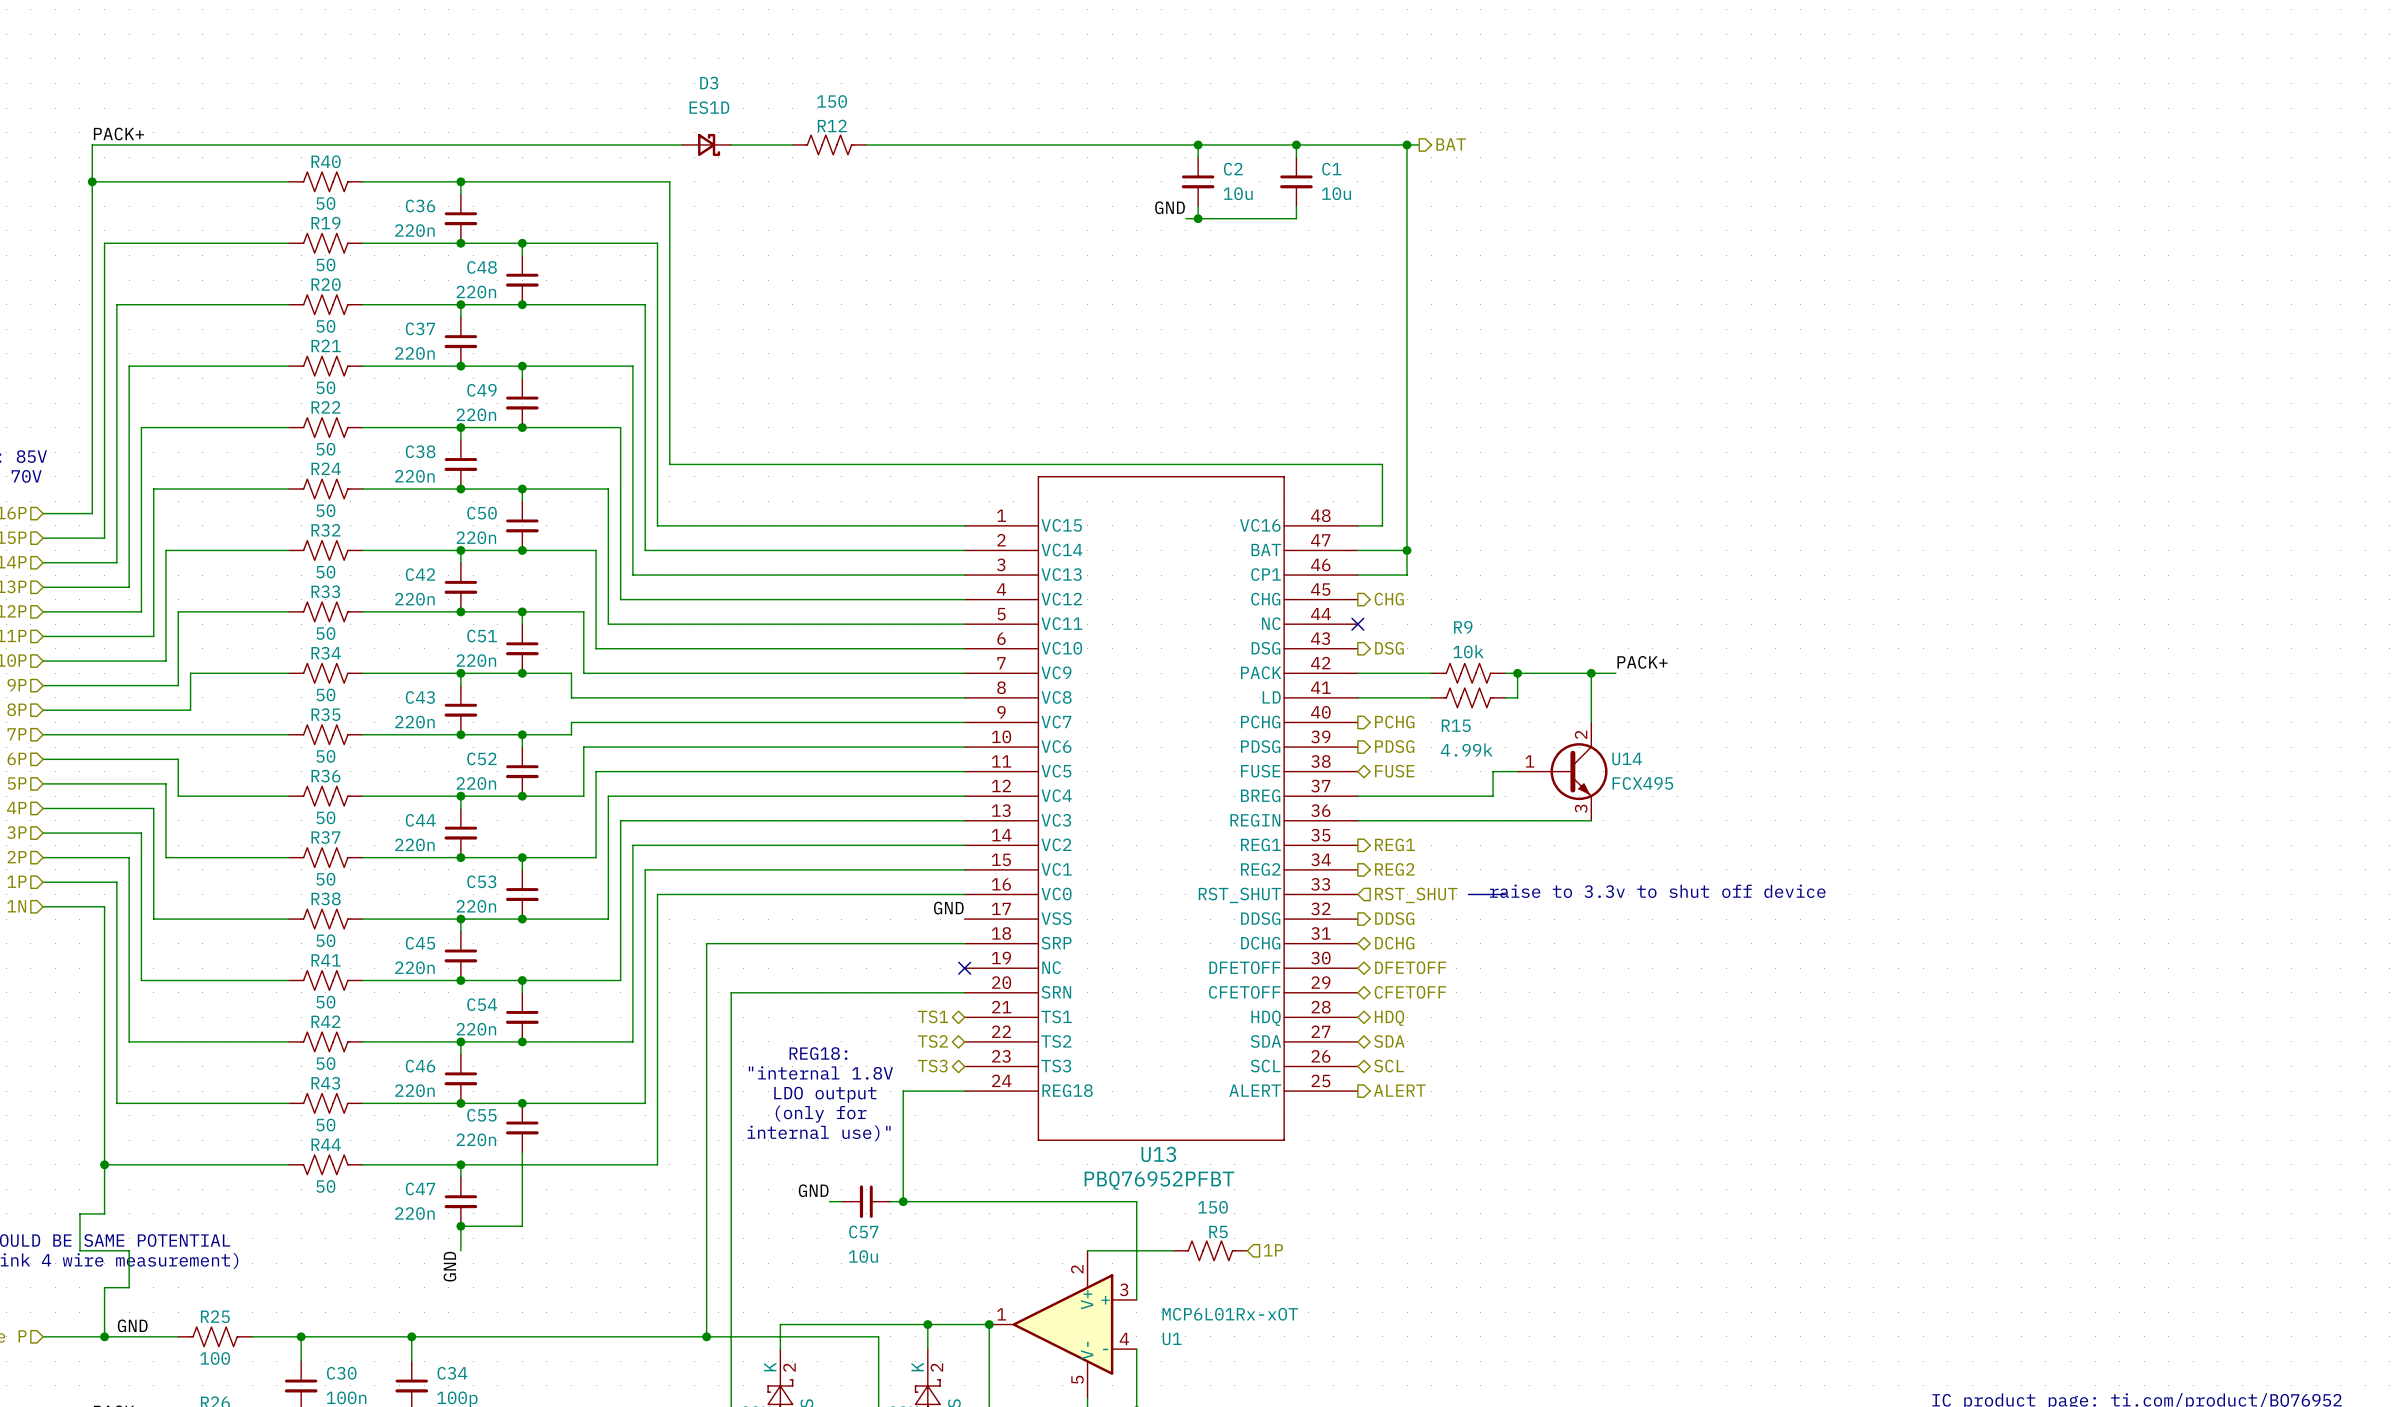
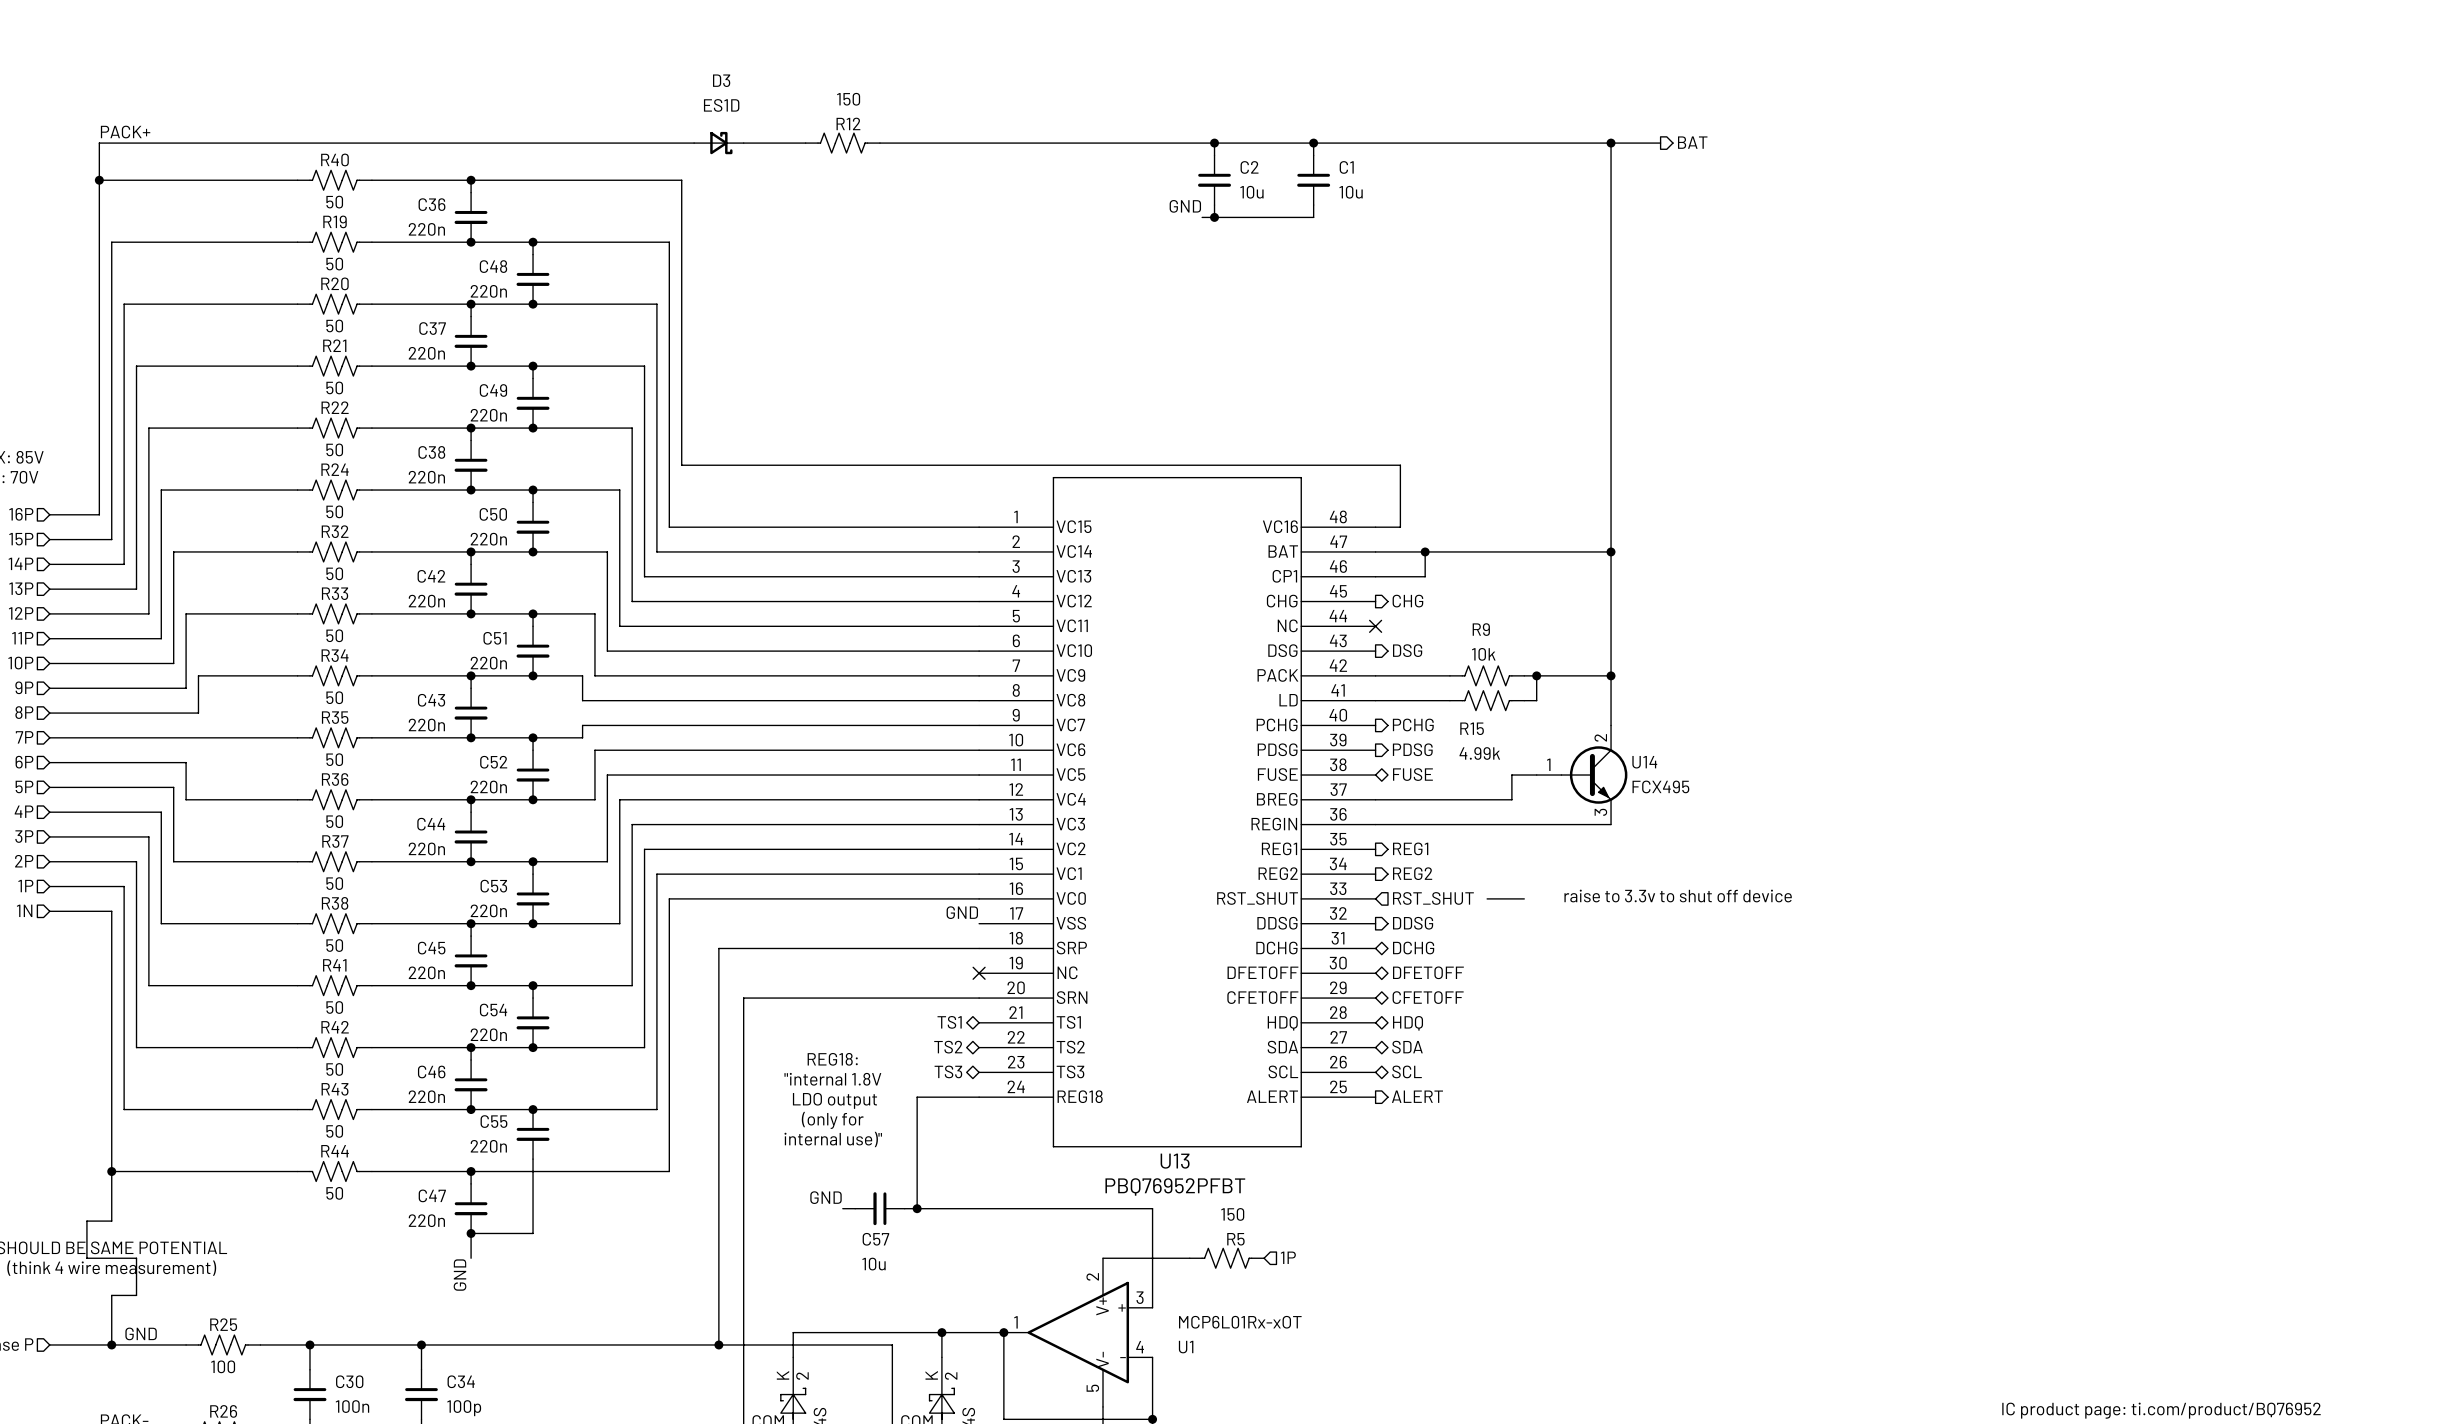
wire: (1407, 144) (1407, 550) -> (1611, 551) (1425, 551)
junction: (1407, 144) -> none
wire: none -> (1437, 143) (1660, 143)
hierarchical label position: BAT (1451, 144) -> BAT (1692, 142)
junction: none -> (1611, 143)
junction: none -> (1611, 551)
label: PACK+ (1642, 662) -> none
wire: (1591, 673) (1615, 673) -> (1611, 675) (1611, 143)

